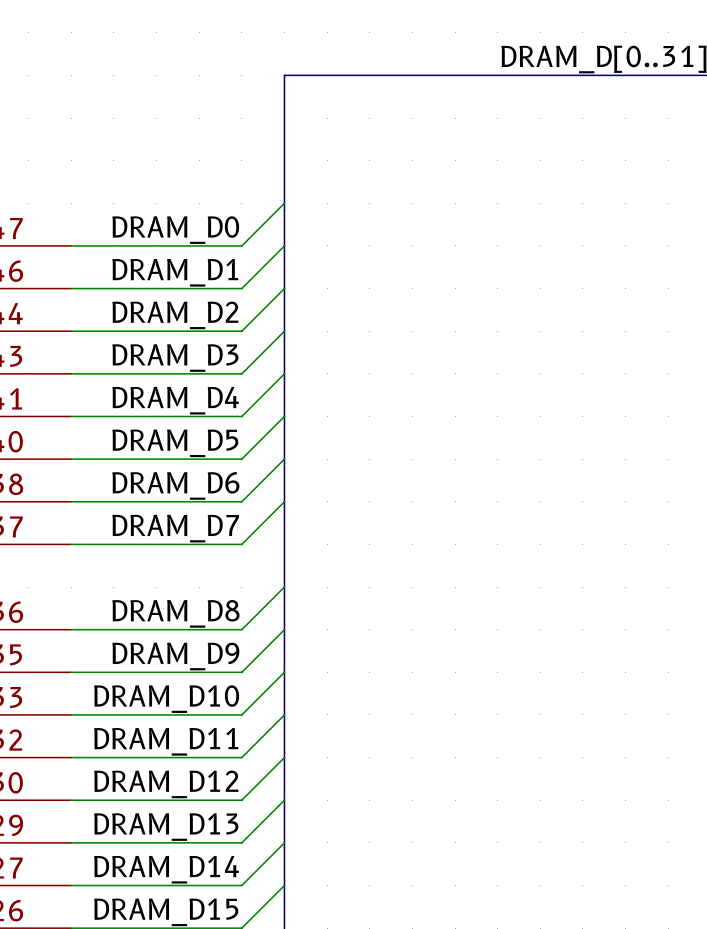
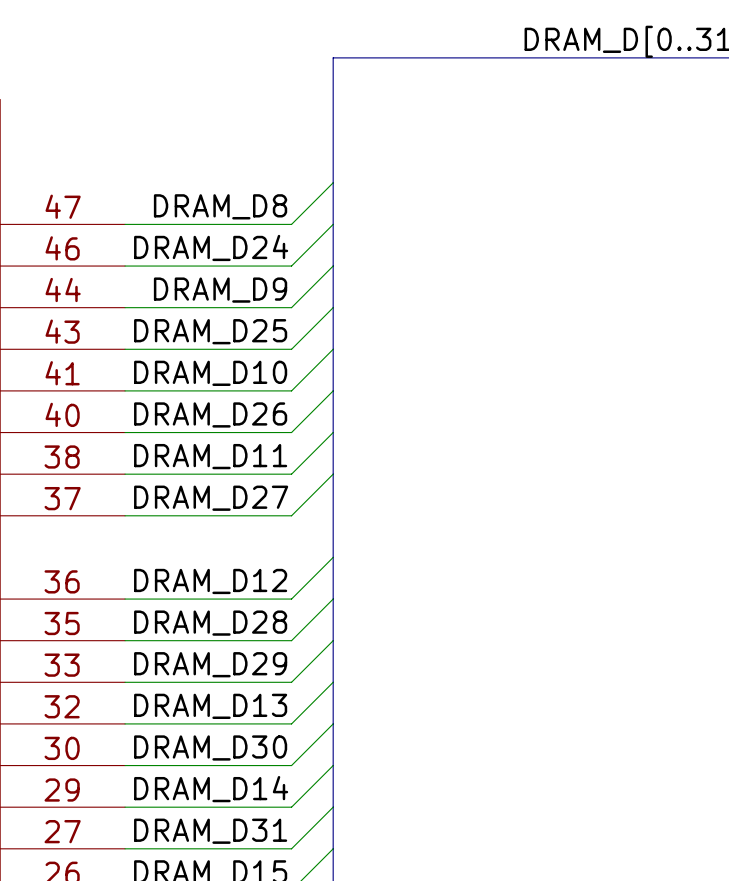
label: DRAM_D0 (175, 230) -> DRAM_D8 (220, 206)
label: DRAM_D1 (175, 272) -> DRAM_D24 (211, 247)
label: DRAM_D2 (175, 315) -> DRAM_D9 (220, 290)
label: DRAM_D3 (175, 358) -> DRAM_D25 (210, 331)
label: DRAM_D4 (175, 400) -> DRAM_D10 (210, 373)
label: DRAM_D5 (175, 443) -> DRAM_D26 (210, 414)
label: DRAM_D6 (175, 485) -> DRAM_D11 (210, 456)
label: DRAM_D7 (175, 528) -> DRAM_D27 (211, 498)
label: DRAM_D8 (175, 613) -> DRAM_D12 (210, 581)
label: DRAM_D9 (175, 656) -> DRAM_D28 (210, 623)
label: DRAM_D10 (166, 699) -> DRAM_D29 (210, 664)
label: DRAM_D11 (166, 741) -> DRAM_D13 (210, 706)
label: DRAM_D12 (166, 784) -> DRAM_D30 (210, 747)
label: DRAM_D13 (166, 827) -> DRAM_D14 (211, 789)
label: DRAM_D14 (166, 869) -> DRAM_D31 (210, 831)

